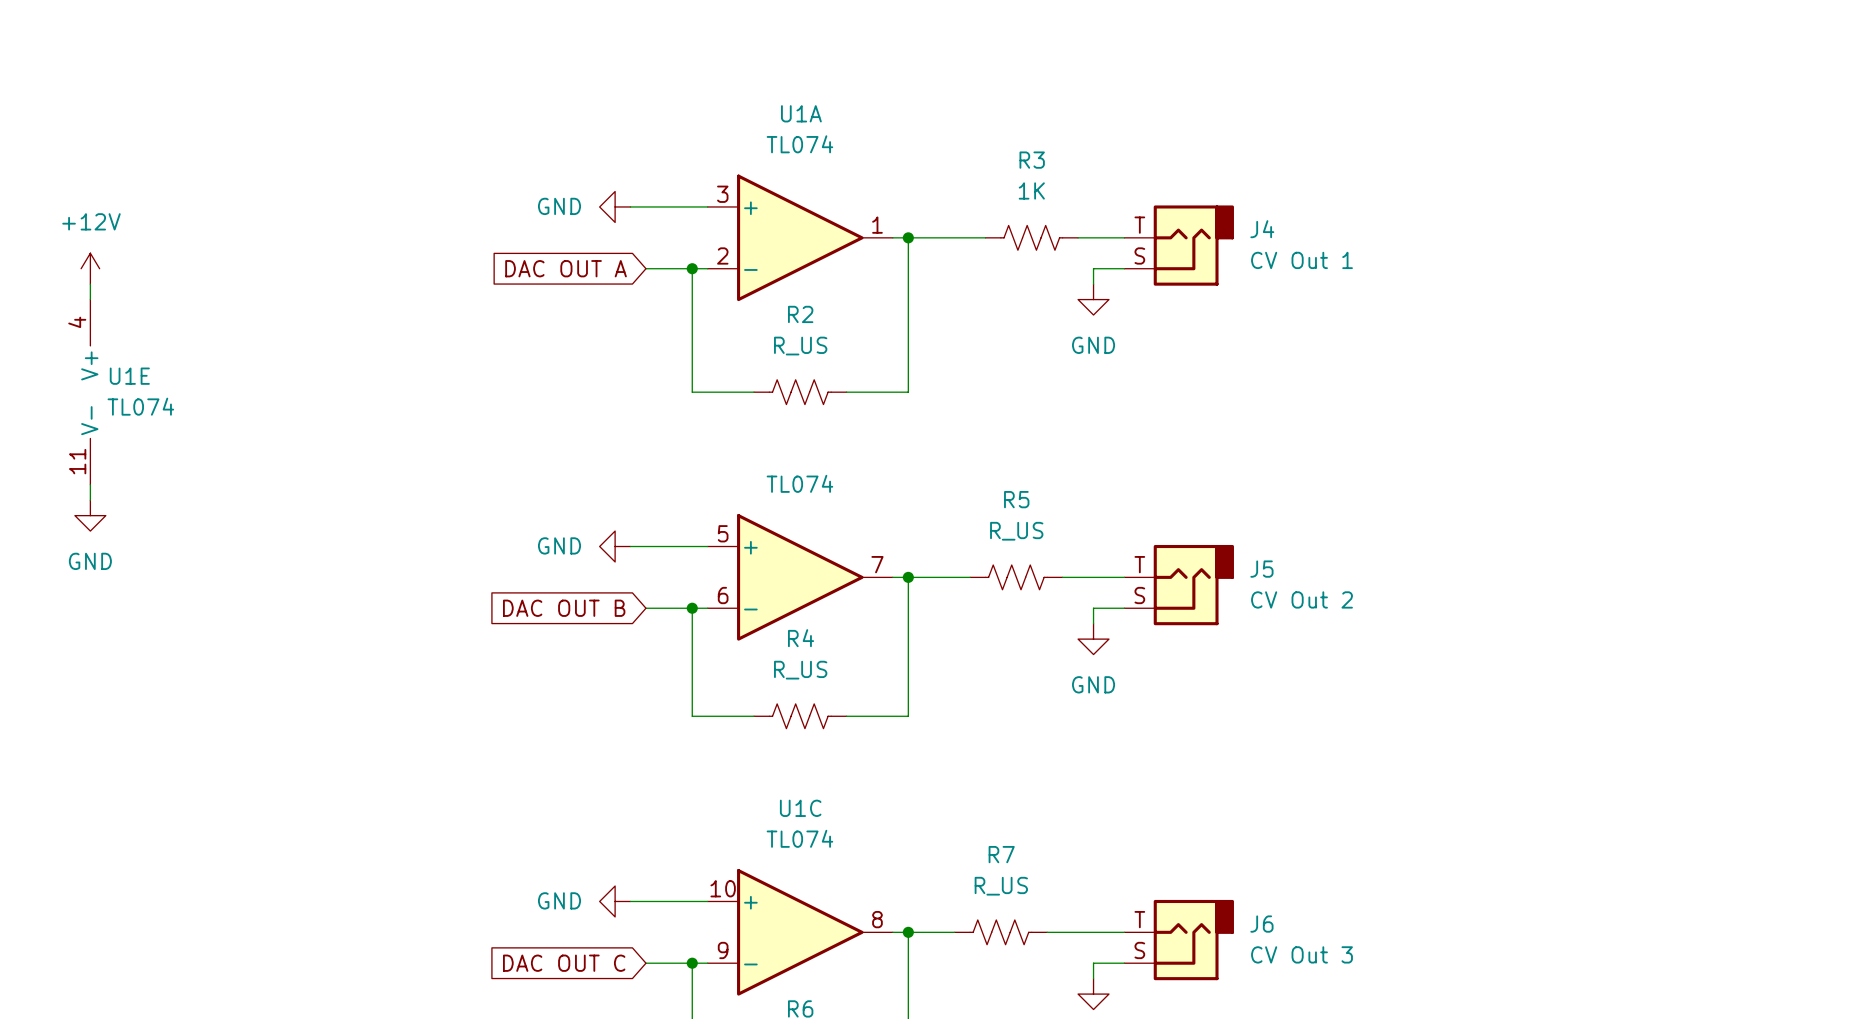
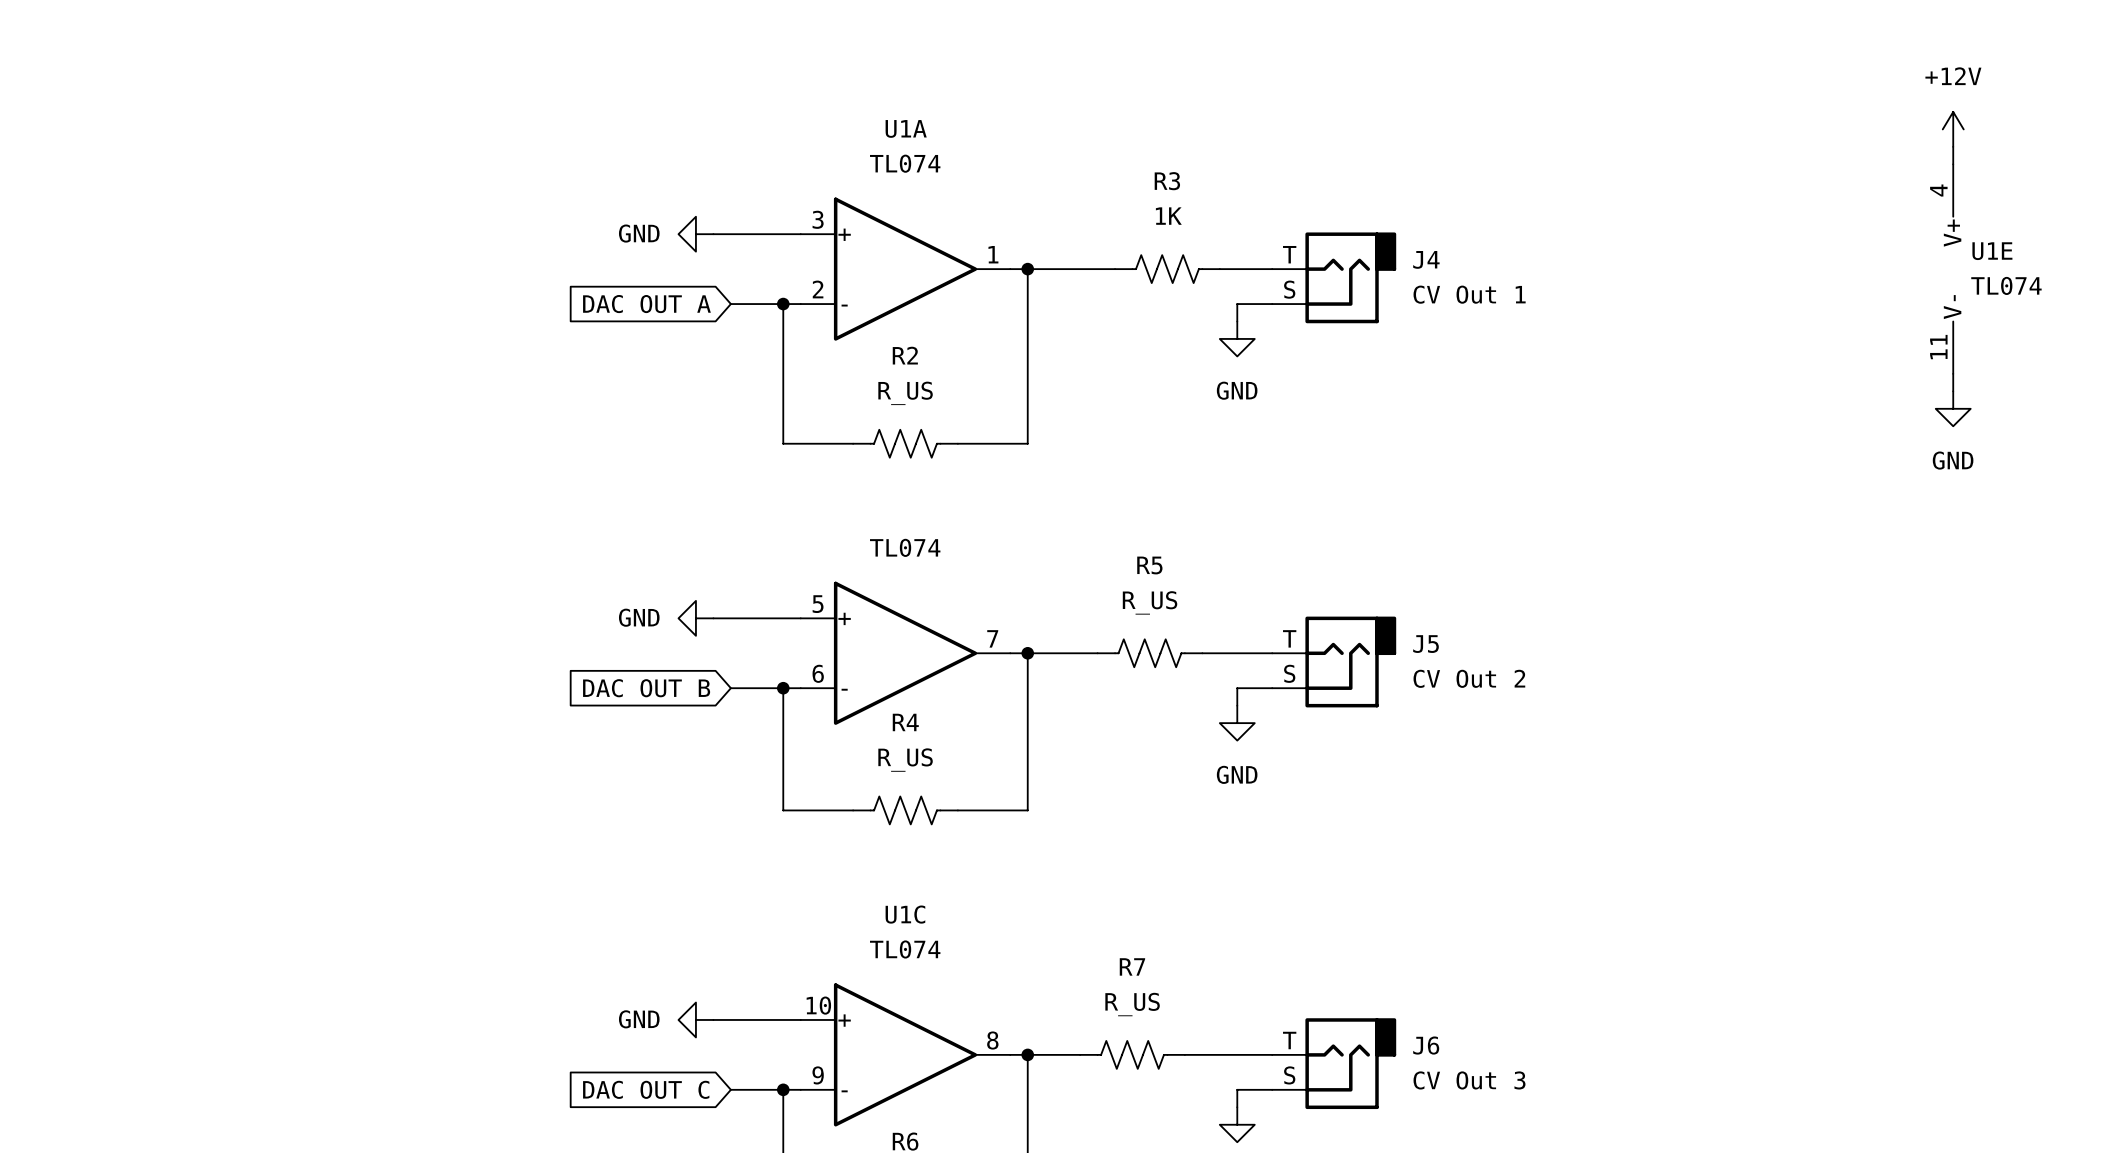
power symbol: none -> +12V (1953, 129)
wire: none -> (1953, 146) (1953, 164)
power symbol: +12V (90, 268) -> none
wire: (90, 284) (90, 299) -> none
wire: none -> (1953, 373) (1953, 391)
power symbol: none -> GND (1953, 408)
U1E position: (90, 392) -> (1953, 269)
wire: (90, 484) (90, 500) -> none
power symbol: GND (90, 515) -> none

